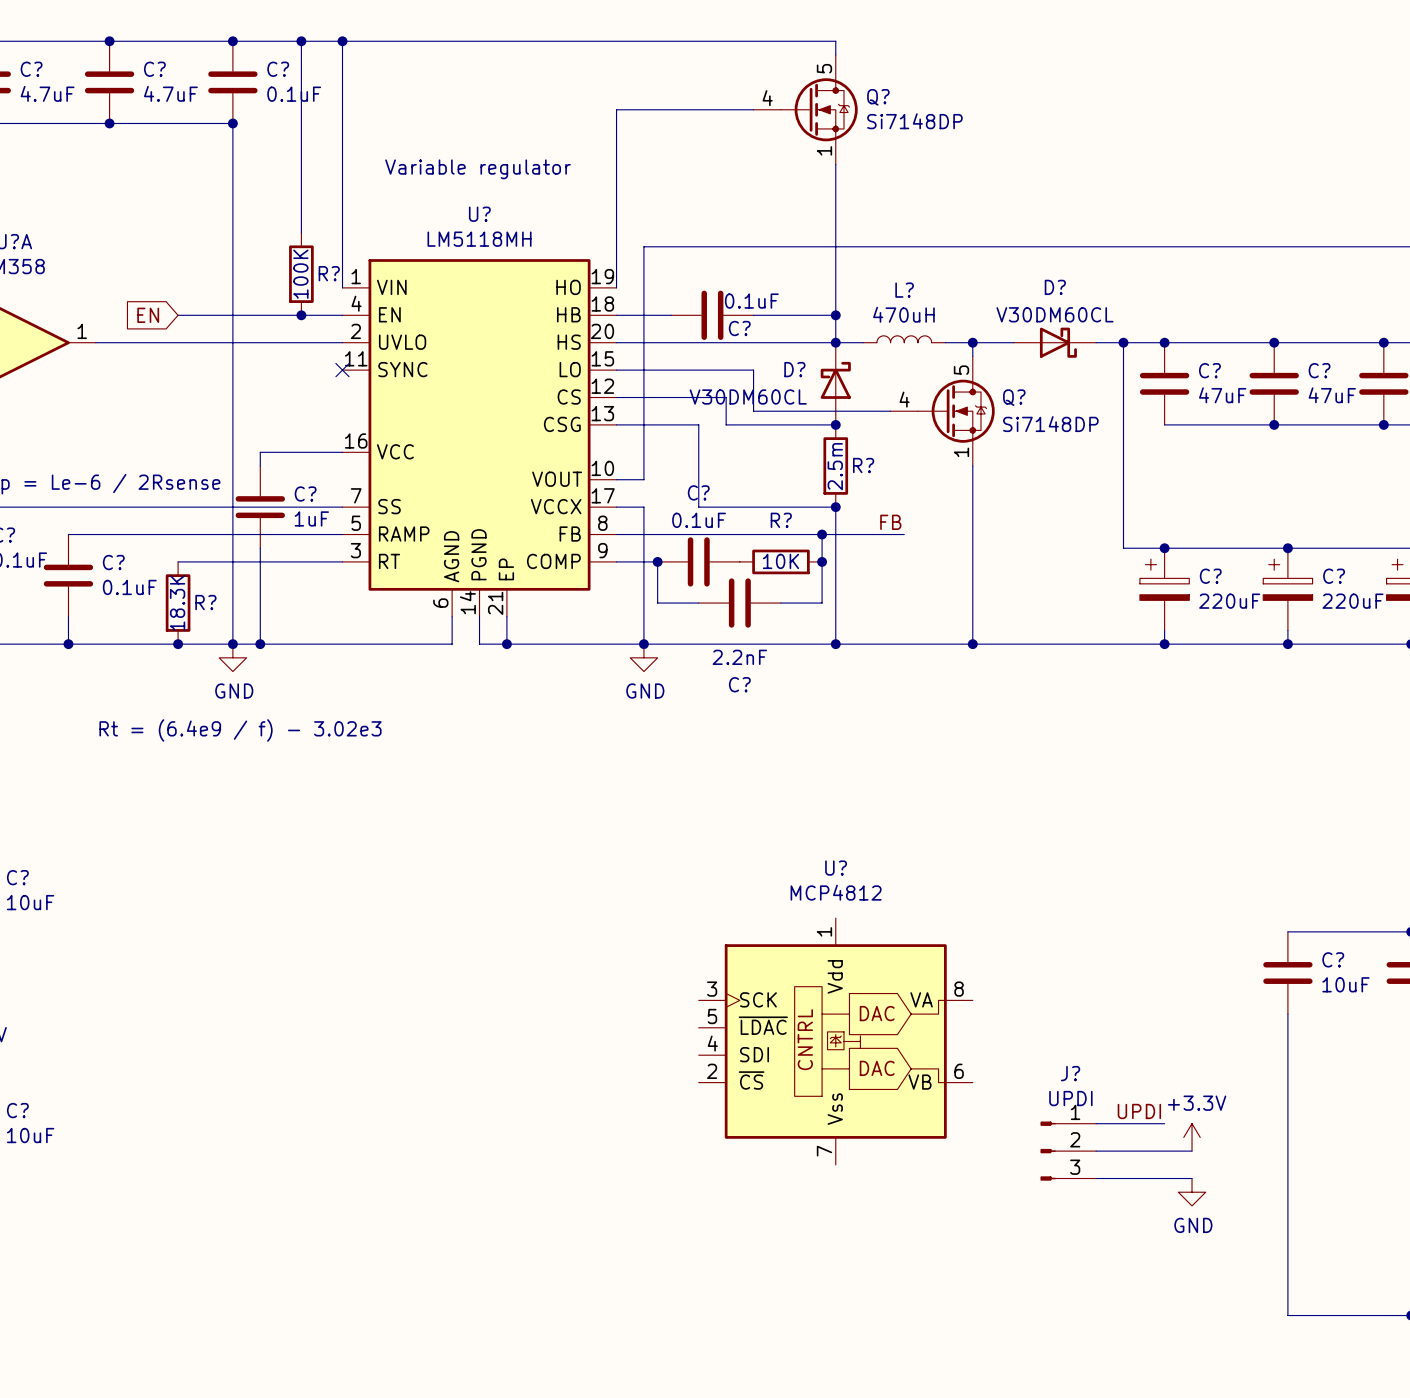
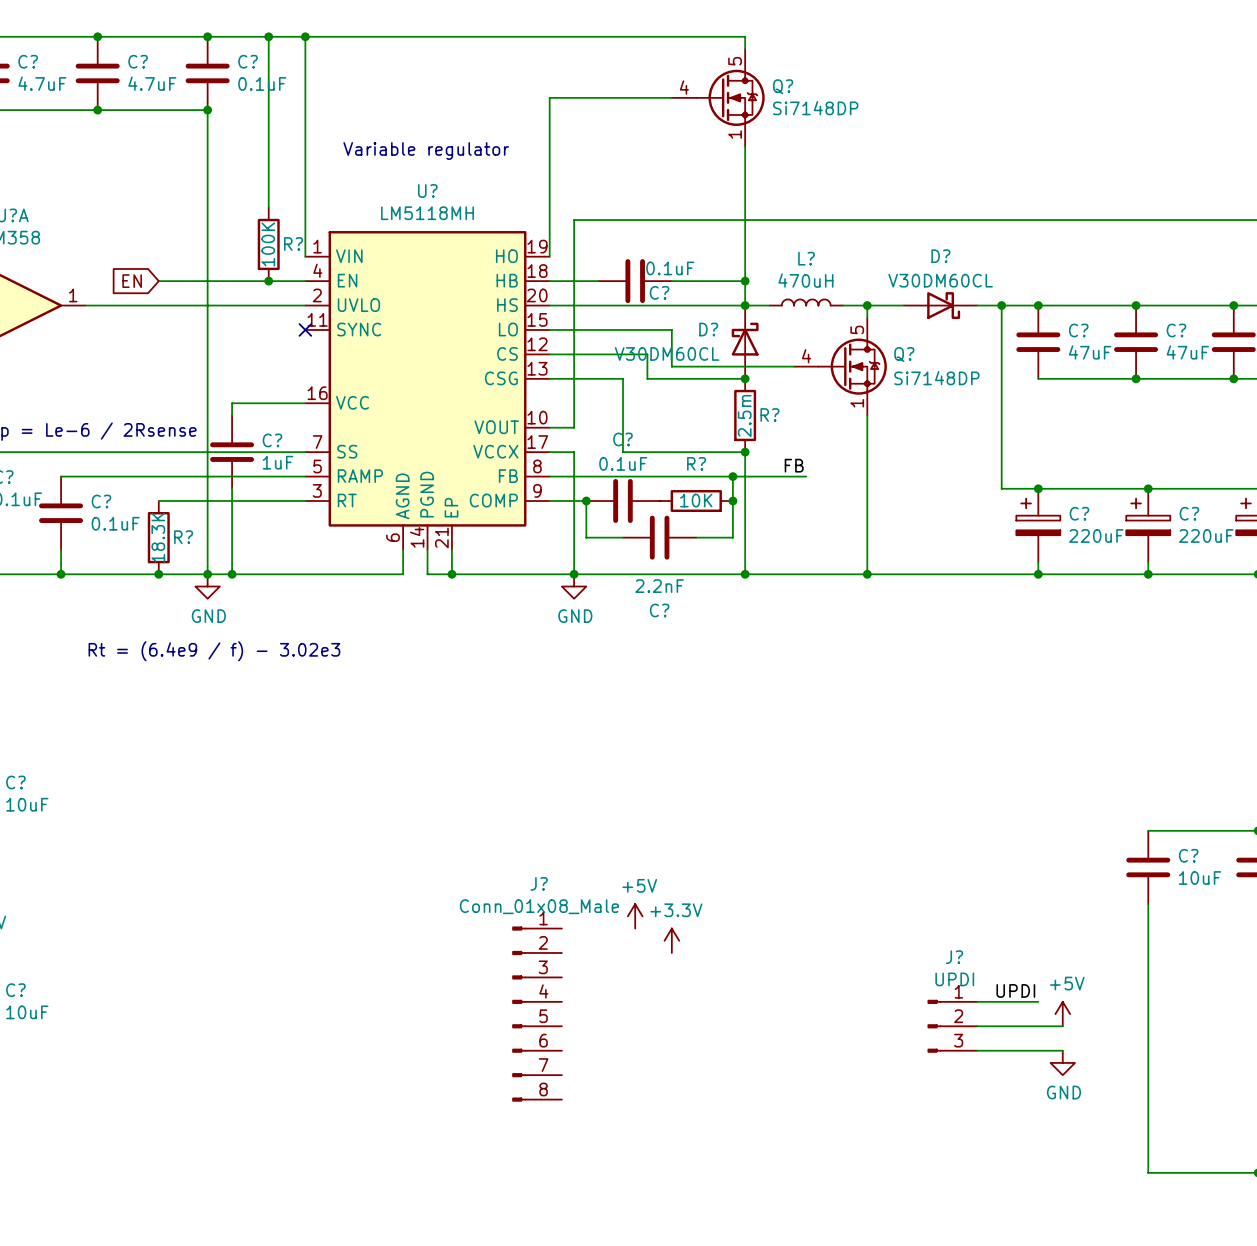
power symbol: none -> +5V (635, 916)
U?: MCP4812 (835, 1041) -> none
power symbol: none -> +3.3V (671, 940)
J?: none -> Conn_01x08_Male (537, 1014)
power symbol: +3.3V (1192, 1137) -> +5V (1062, 1014)

